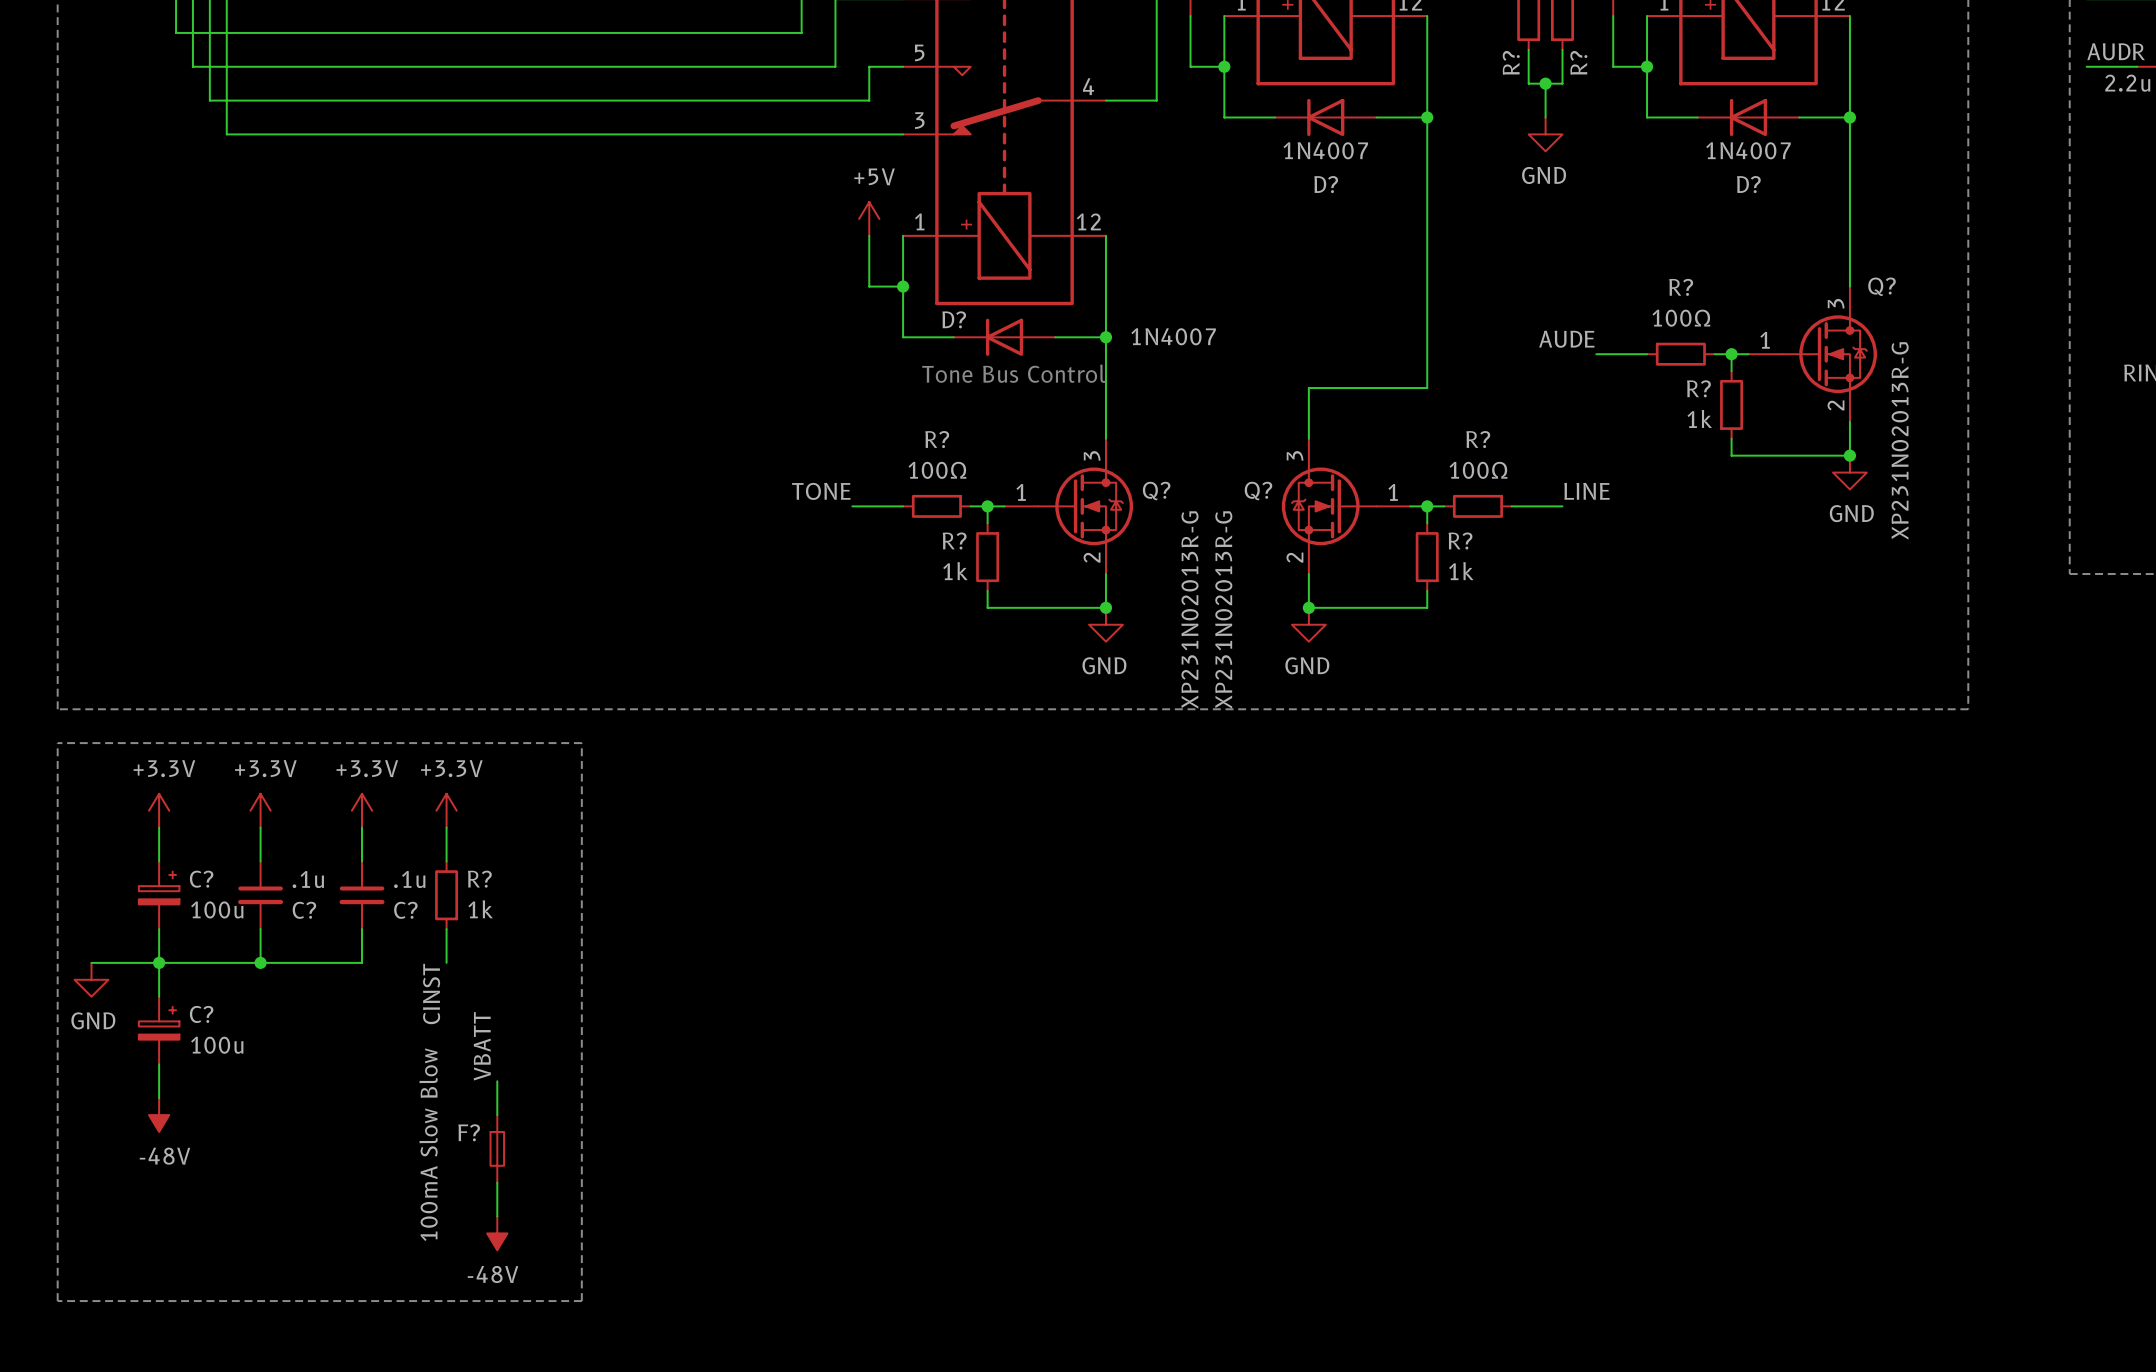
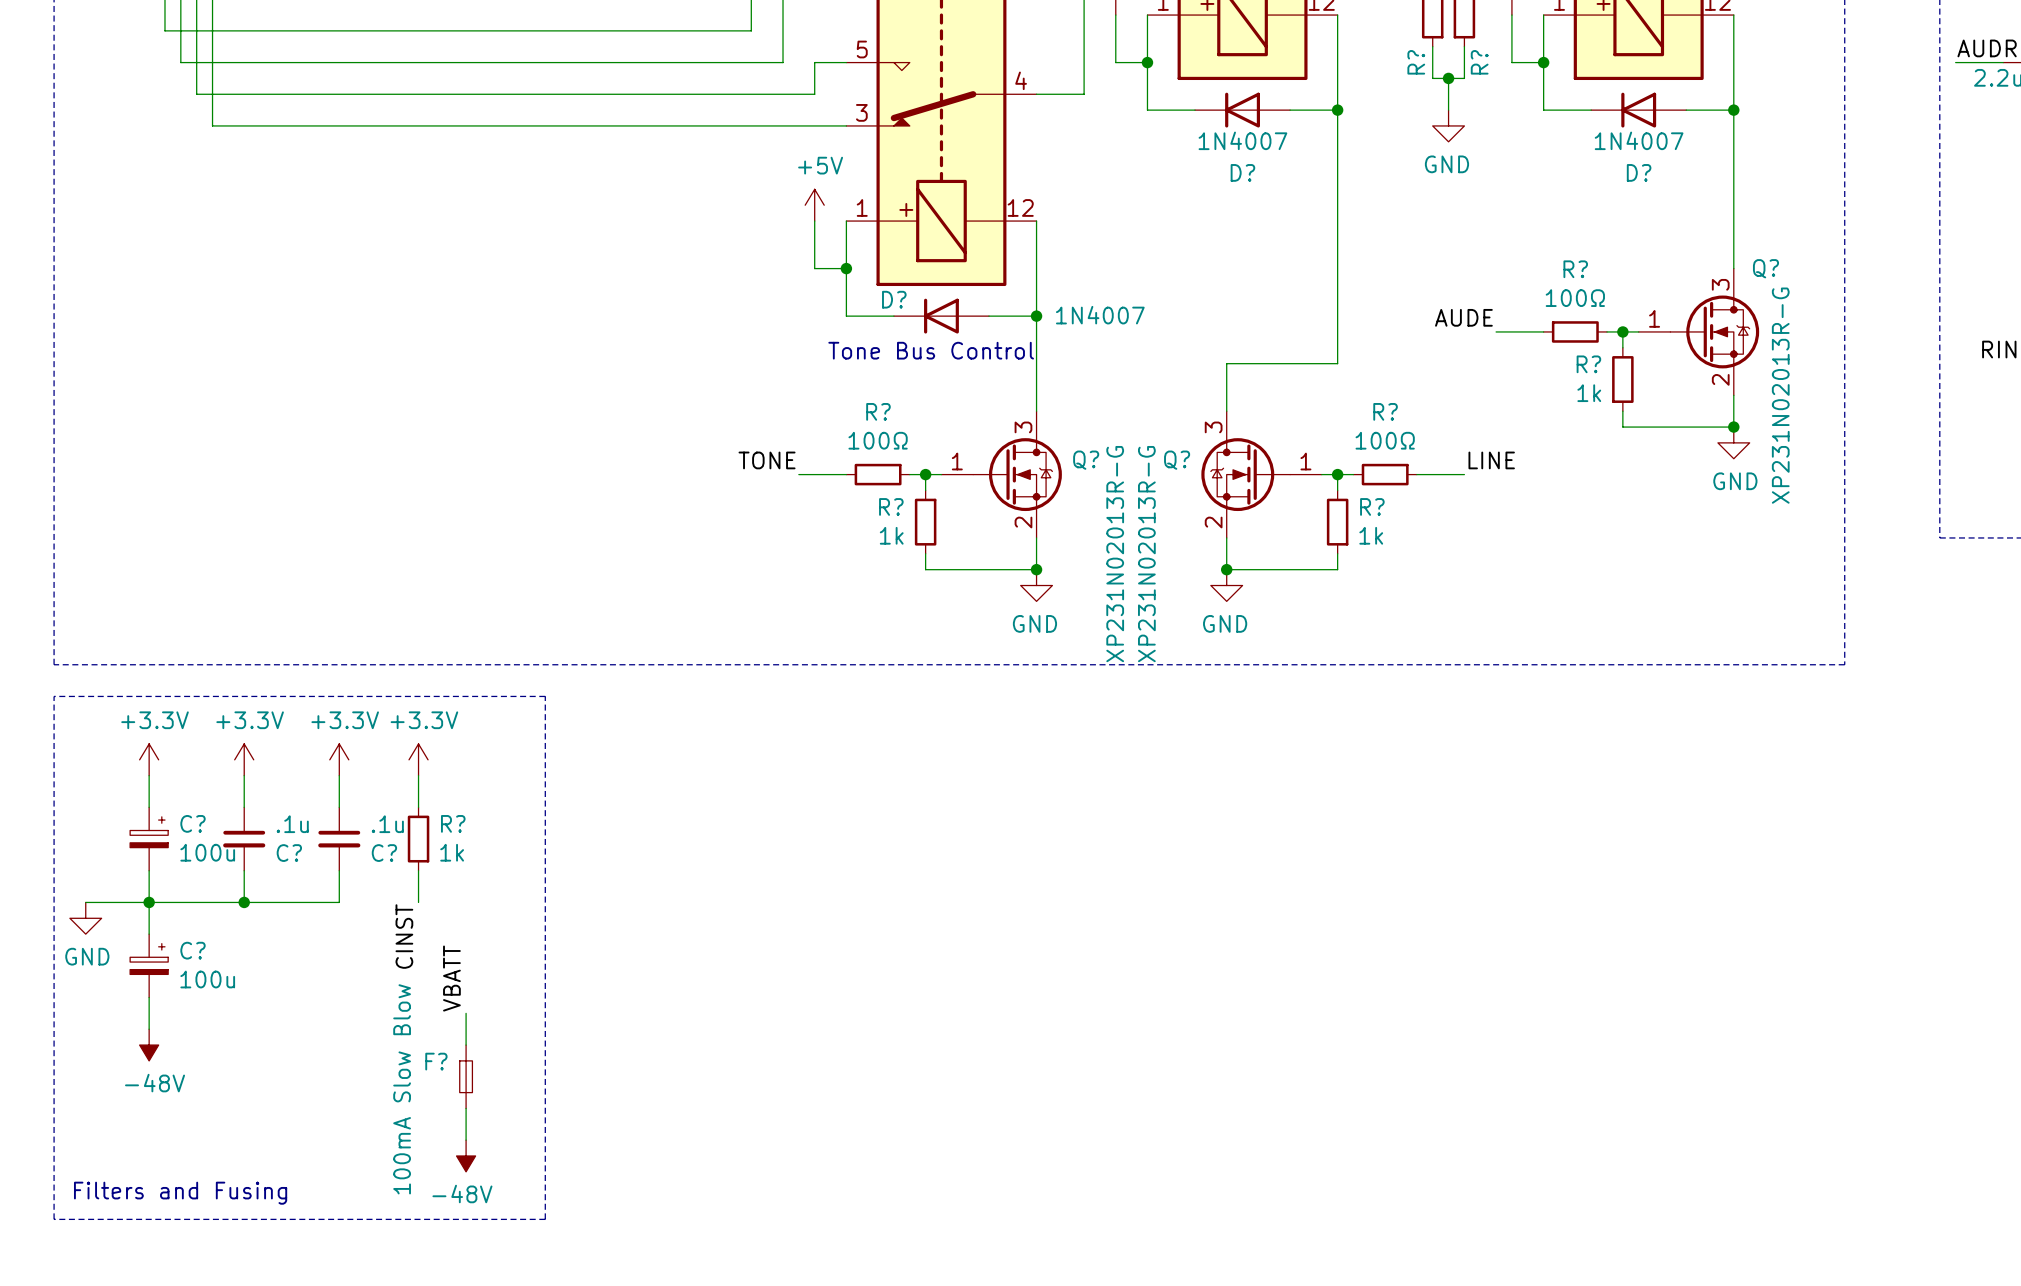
text: none -> Filters and Fusing (180, 1193)

